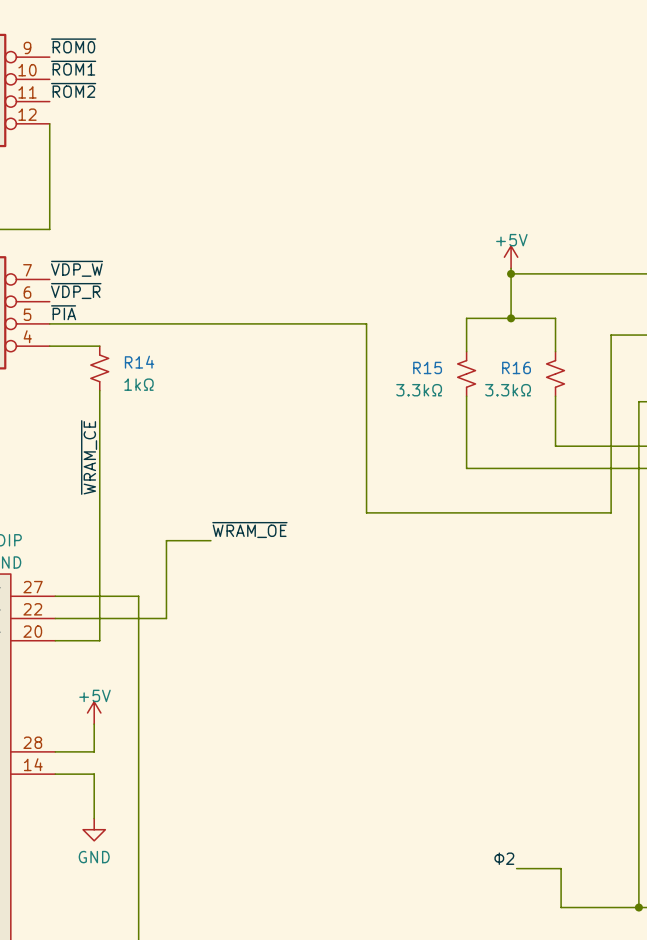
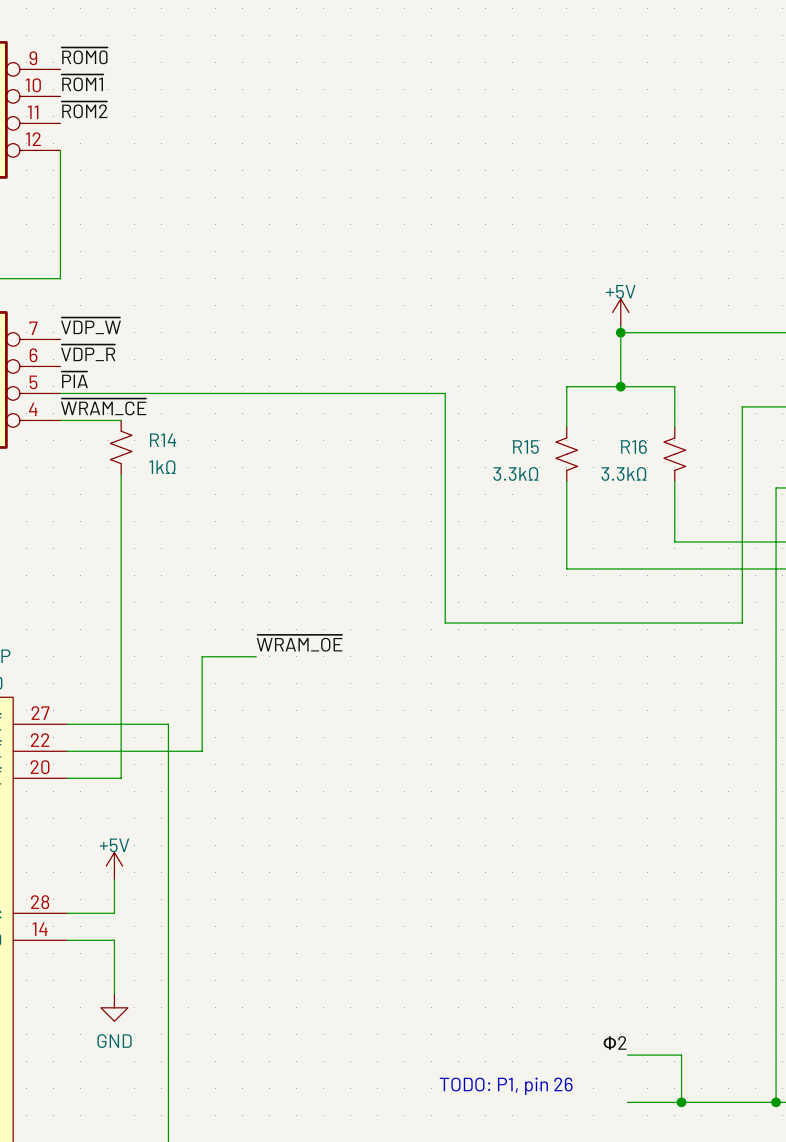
label rotation: 0° (89, 457) -> 90° clockwise (103, 406)
text: none -> TODO: P1, pin 26 (506, 1086)
wire: none -> (627, 1102) (681, 1102)
junction: none -> (681, 1102)

